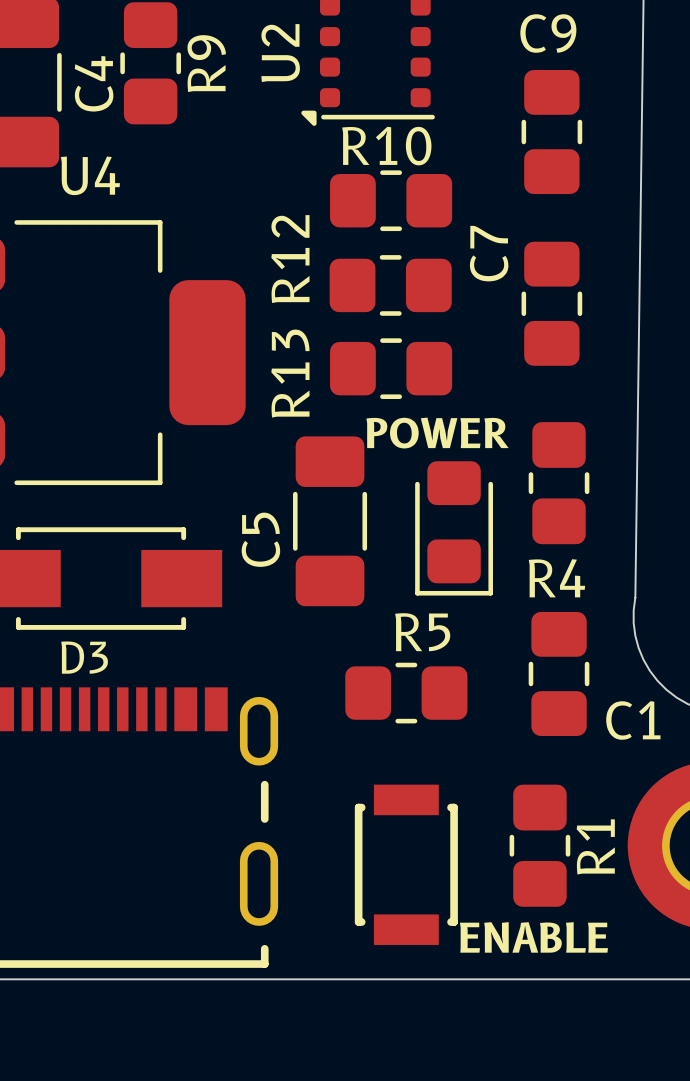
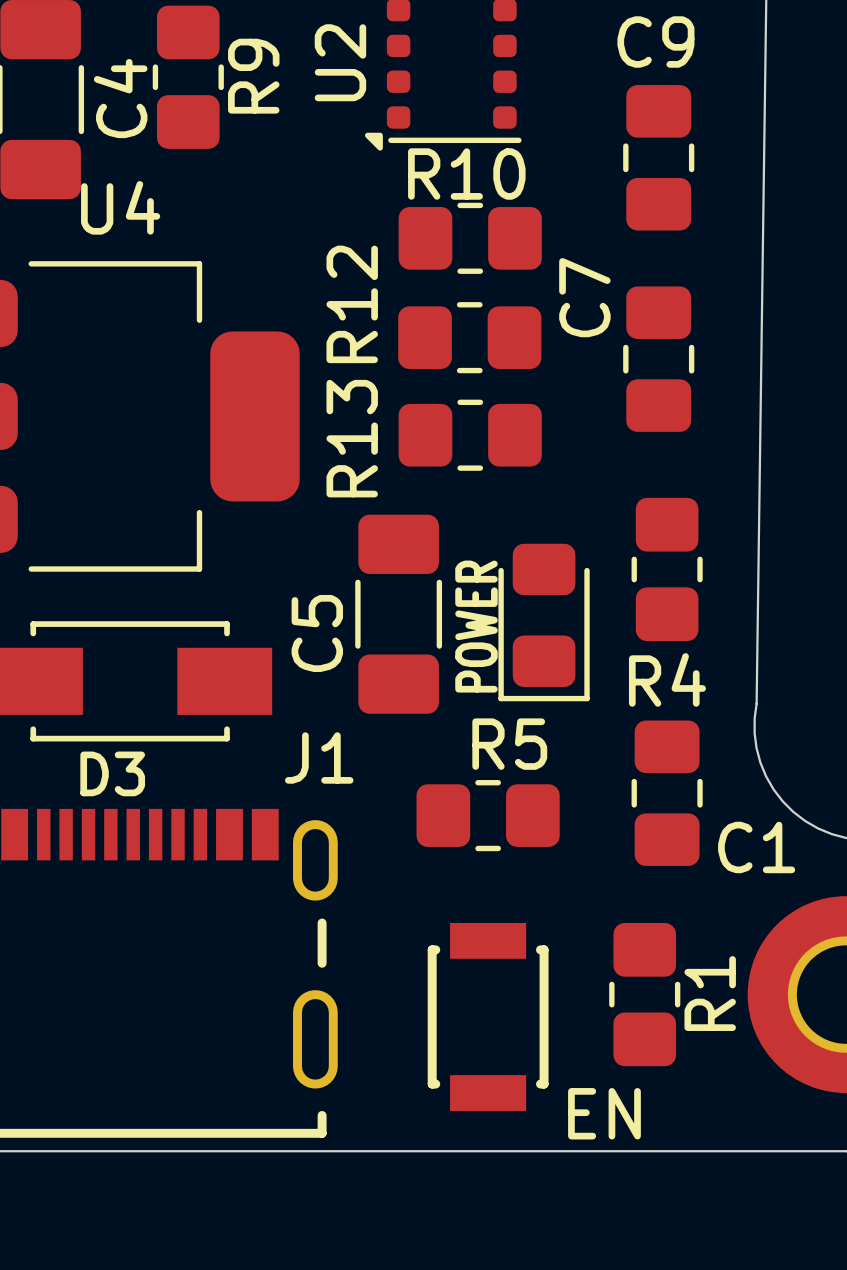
text: POWER (437, 433) -> none
POWER name: none -> POWER (476, 626)
J1 name: none -> J1 (319, 757)
text: ENABLE (533, 937) -> none
EN name: none -> EN (604, 1113)

